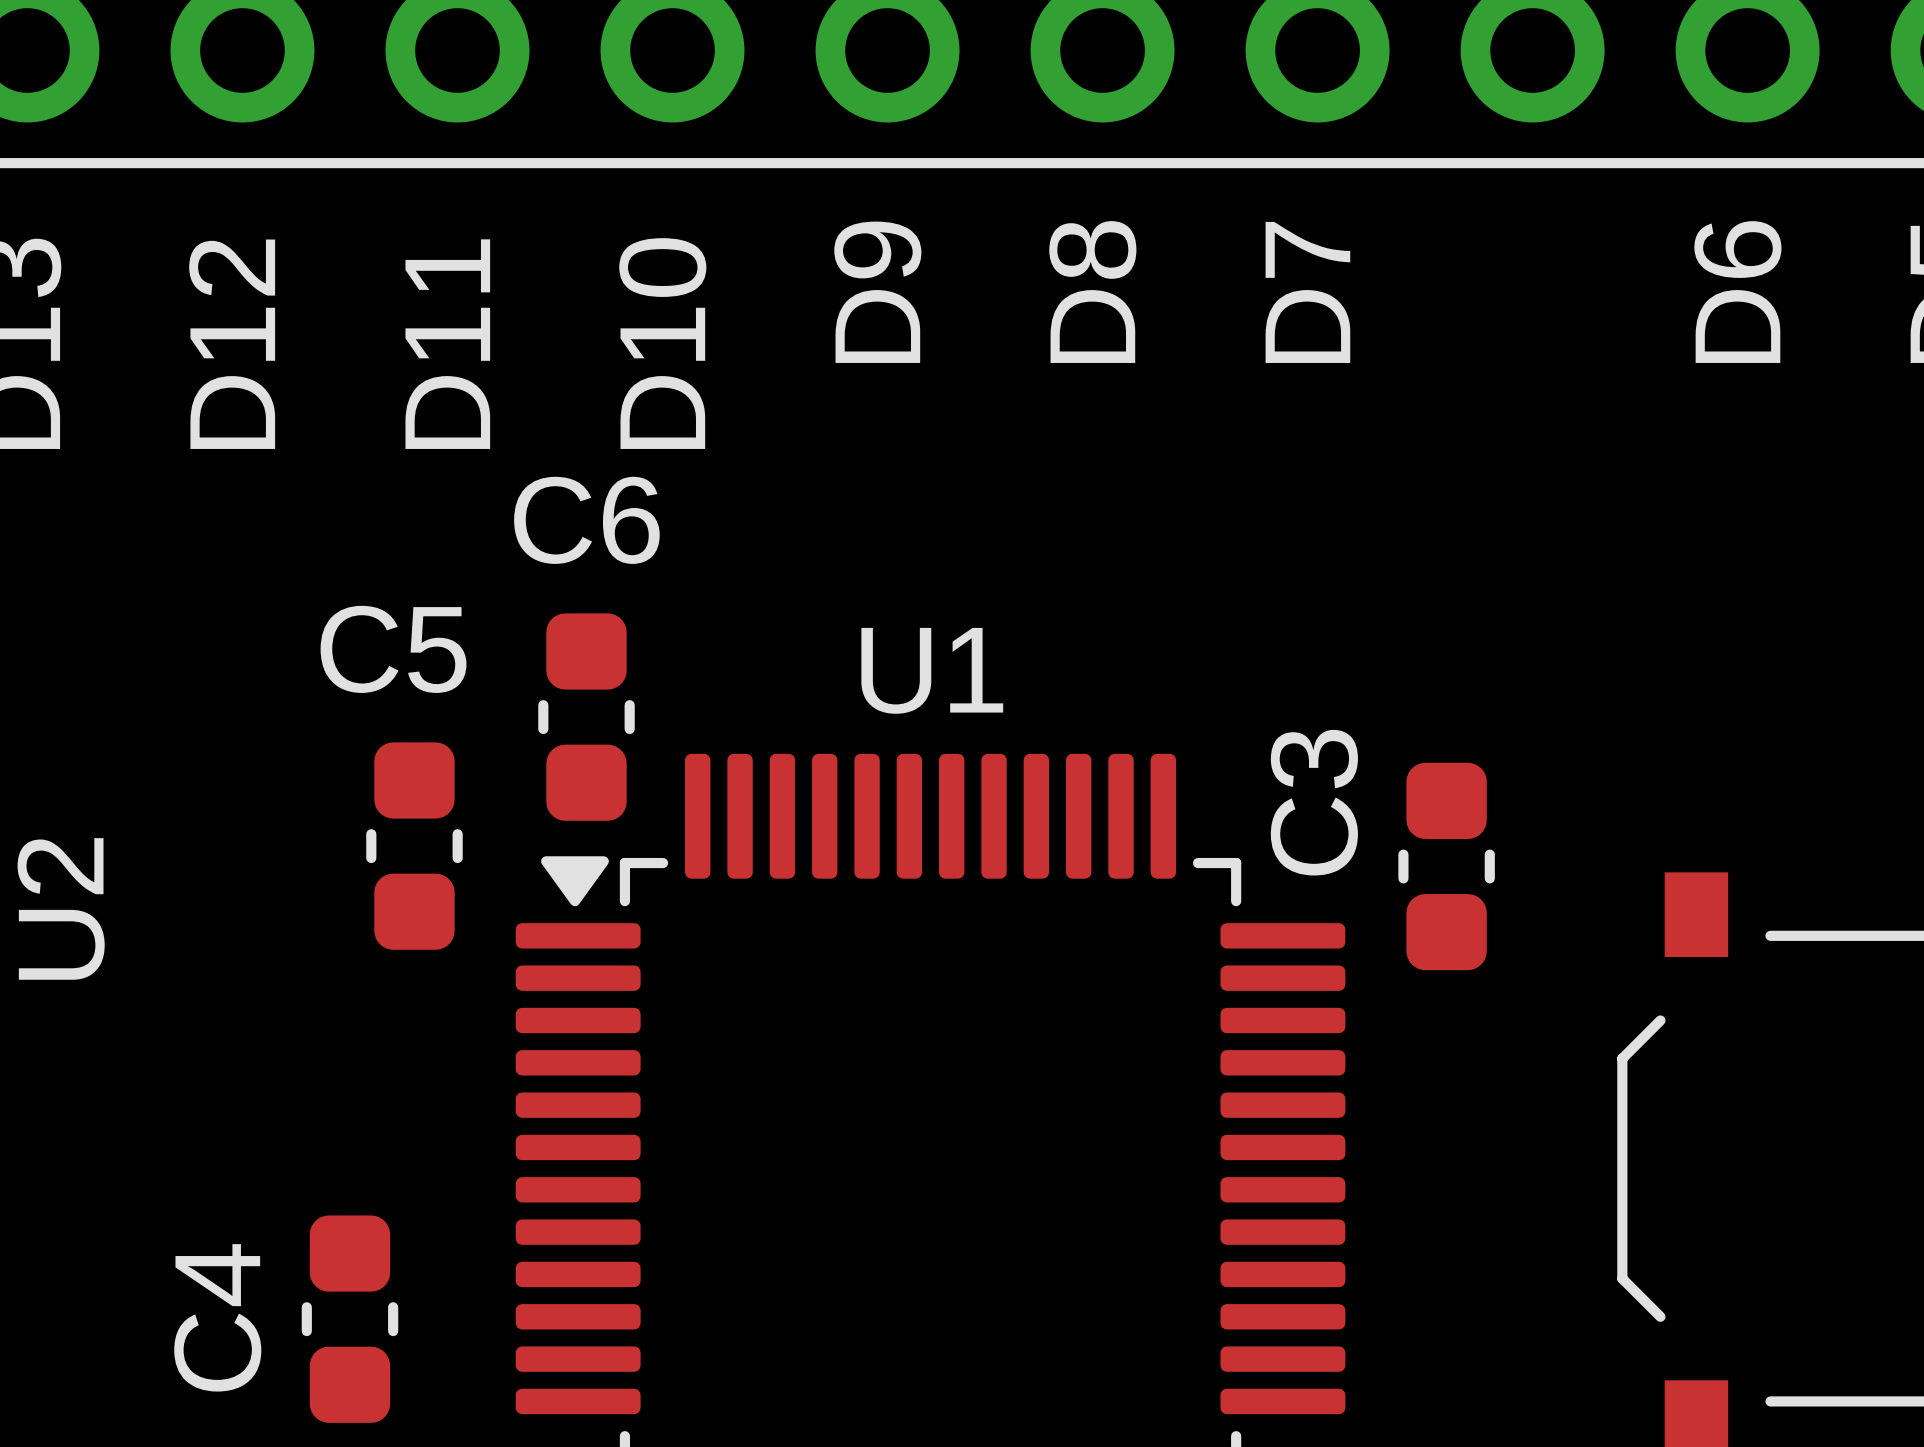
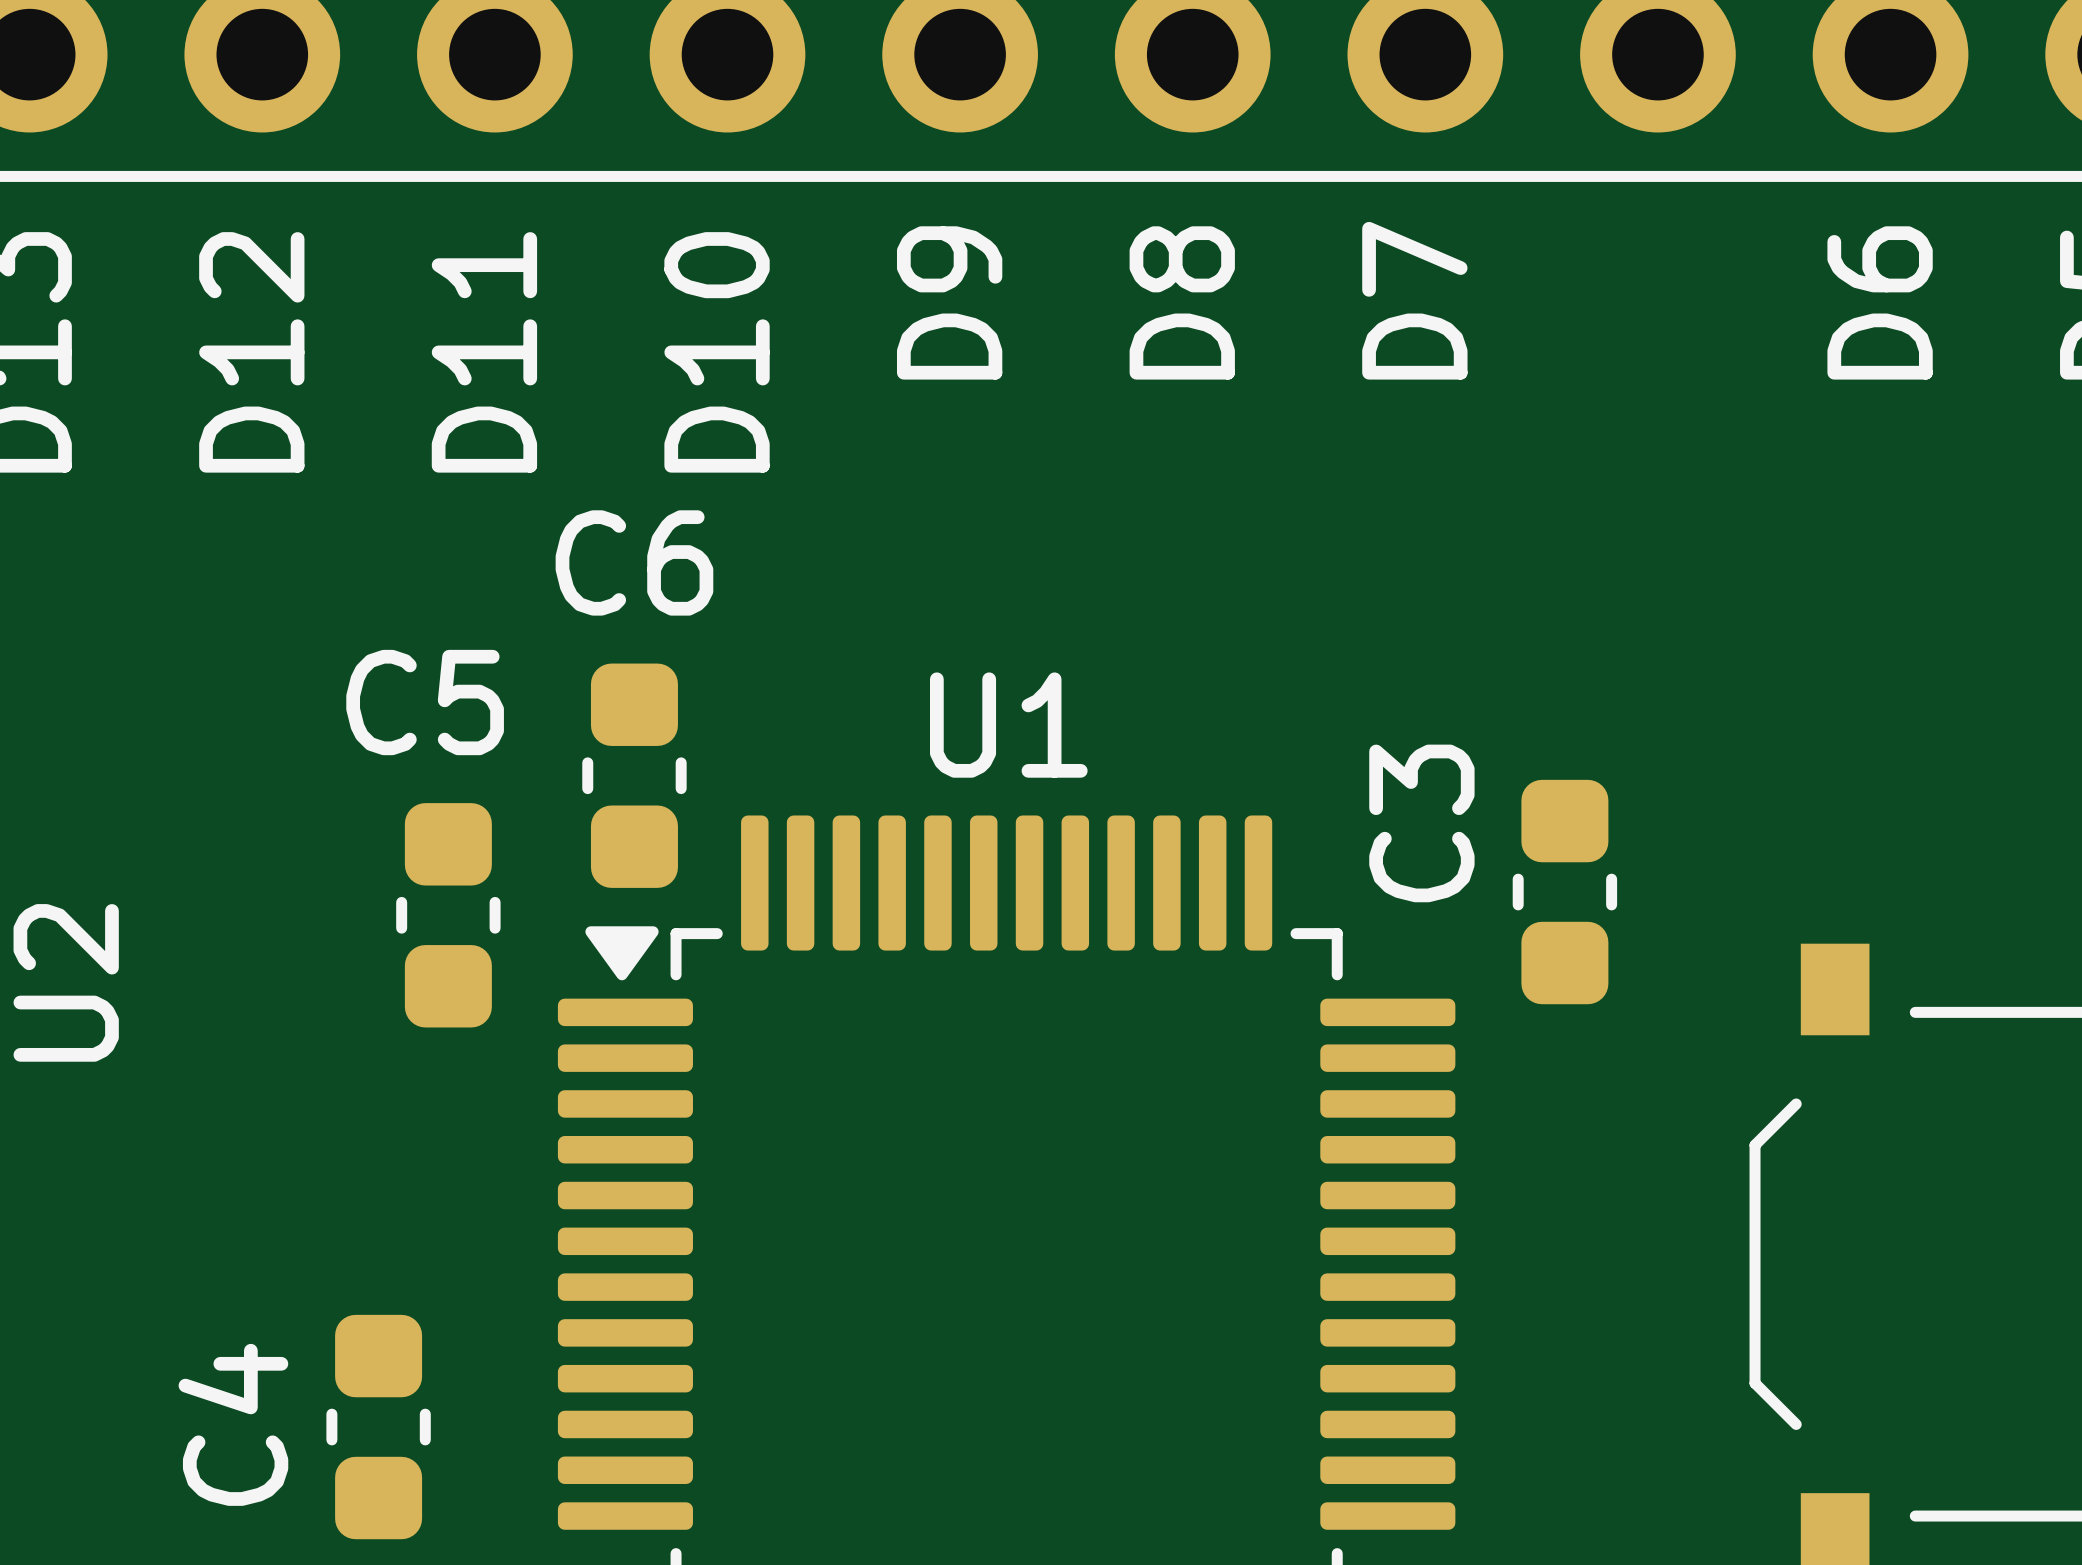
C3 position: (1446, 866) -> (1564, 892)

